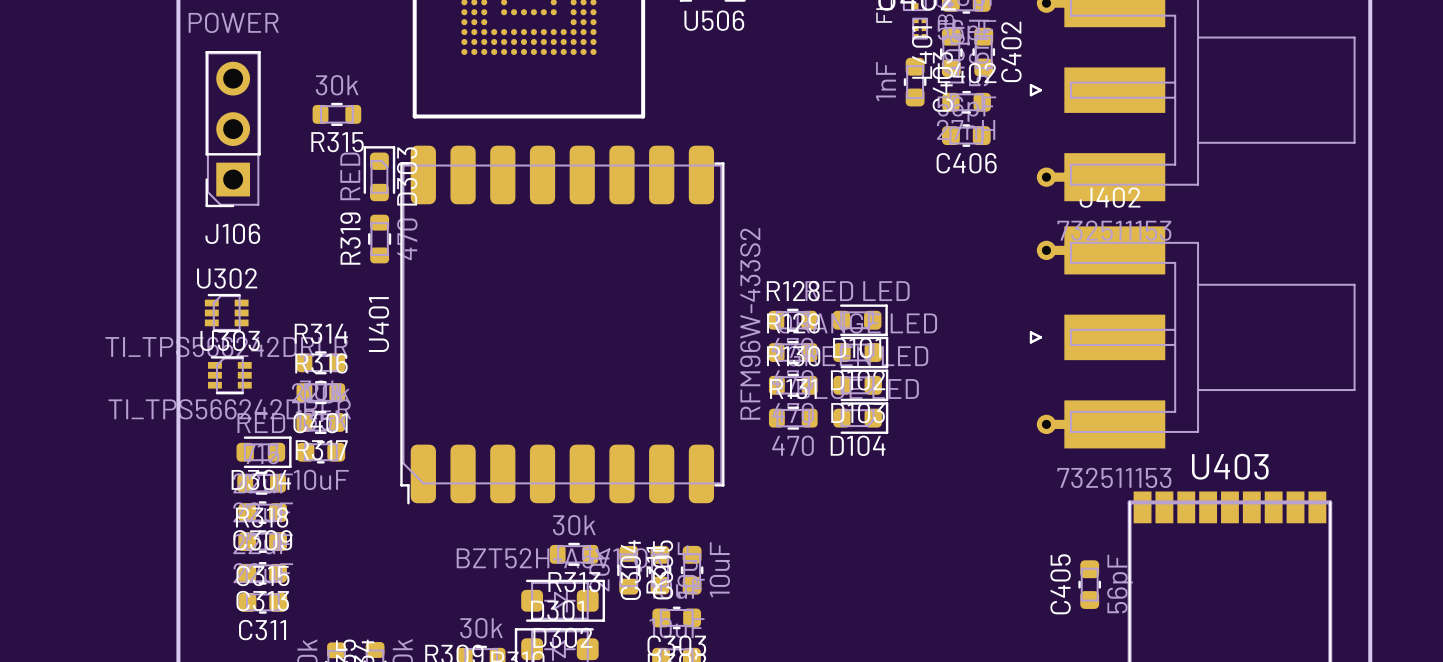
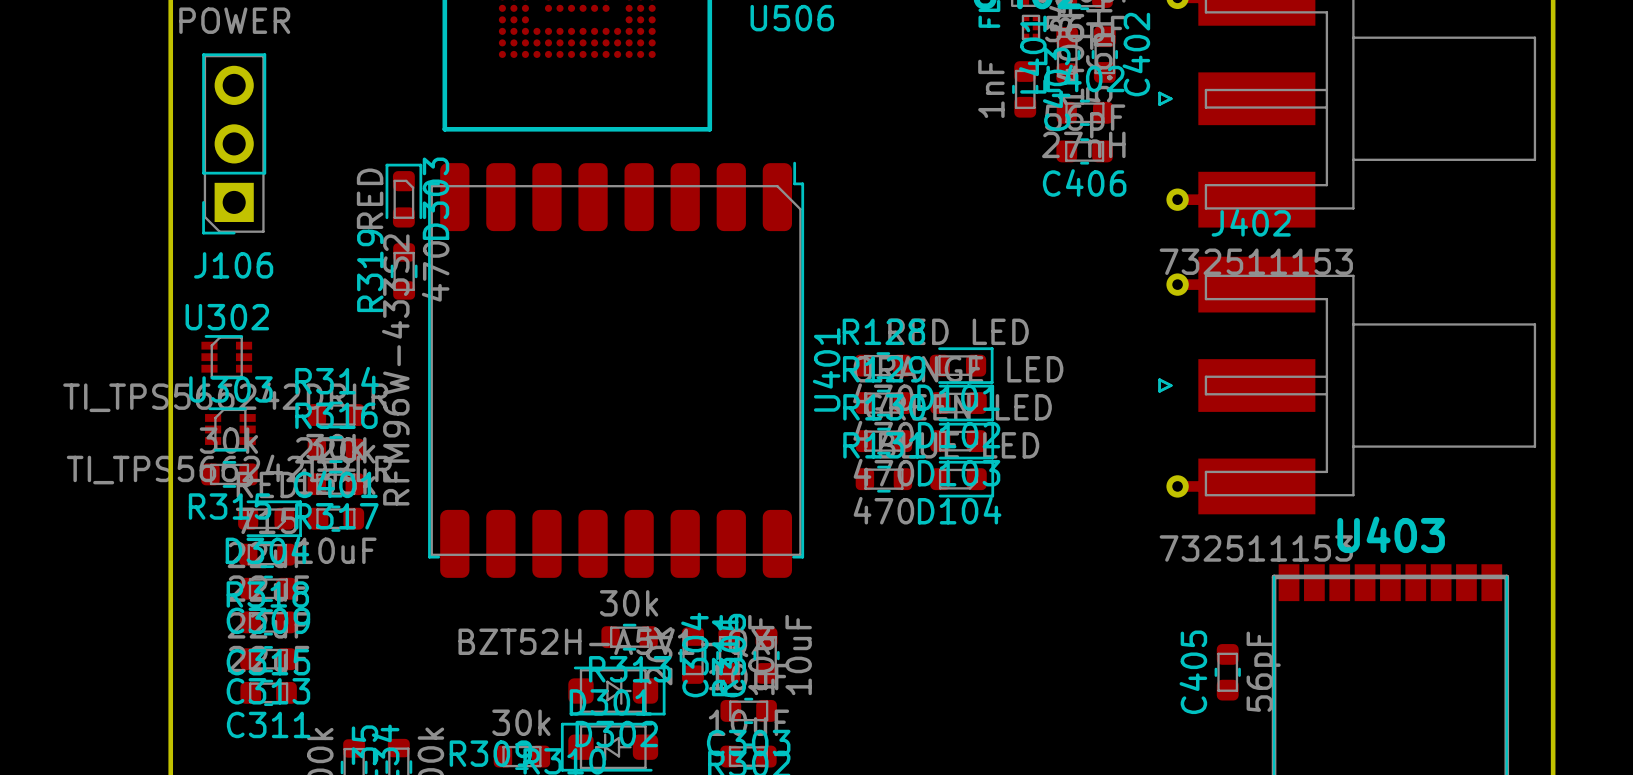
R315 position: (336, 114) -> (229, 474)
U401 rotation: 0° (562, 325) -> 180° (616, 369)

